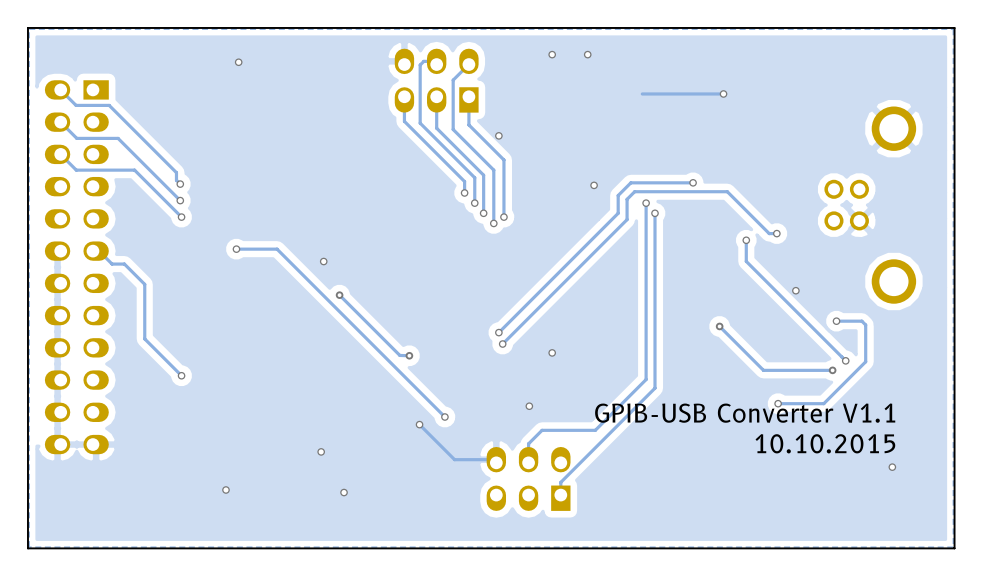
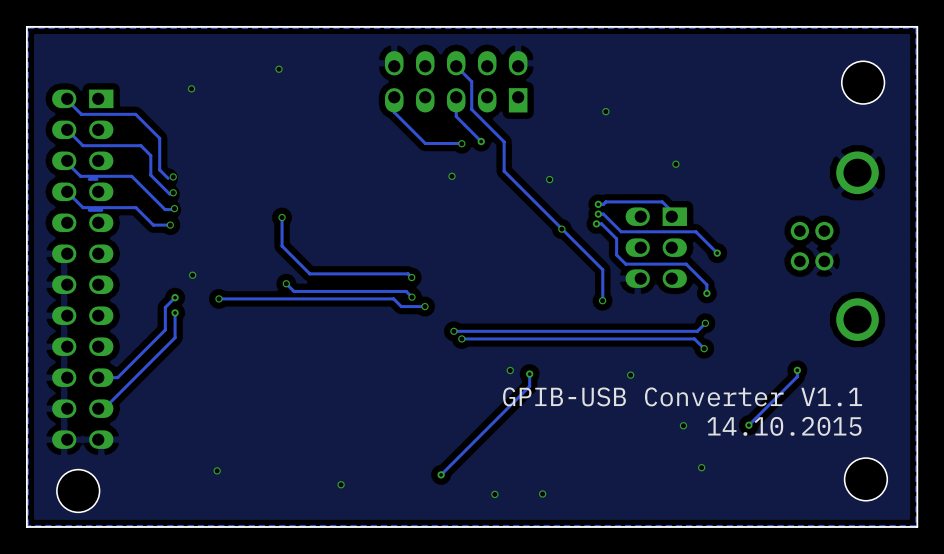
via: (552, 54) -> none
via: (587, 54) -> none
track: (436, 61) (423, 61) (420, 65) (420, 123) (474, 177) (474, 203) -> none
track: (468, 61) (468, 64) (453, 80) (453, 129) (493, 170) (493, 223) -> none
via: (238, 62) -> none
track: none -> (456, 63) (456, 66) (471, 81) (471, 109) (504, 141) (504, 171) (602, 269) (602, 300)
via: none -> (279, 69)
part: (436, 80) -> none
part: none -> (456, 81)
part: none -> (863, 82)
track: (57, 89) (60, 89) (76, 105) (109, 105) (176, 172) (176, 180) (180, 184) -> none
via: none -> (191, 88)
track: (723, 93) (642, 93) -> none
via: (723, 93) -> none
track: (404, 99) (404, 121) (464, 181) (464, 192) -> none
track: (436, 99) (436, 128) (483, 175) (483, 213) -> none
track: (468, 99) (468, 124) (503, 159) (503, 217) -> none
track: none -> (394, 97) (394, 112) (425, 143) (461, 143)
track: none -> (67, 98) (81, 114) (135, 114) (159, 138) (159, 169) (168, 178)
track: none -> (456, 100) (456, 116) (481, 141)
via: none -> (605, 111)
track: (57, 122) (60, 122) (76, 138) (118, 138) (180, 200) -> none
track: none -> (64, 129) (67, 129) (82, 145) (140, 145) (150, 155) (150, 175) (169, 194)
via position: (498, 135) -> (461, 143)
via: none -> (481, 141)
track: (57, 154) (60, 154) (76, 170) (134, 170) (181, 217) -> none
track: none -> (65, 160) (80, 176) (131, 176) (165, 209) (171, 209)
track: (693, 182) (630, 182) (618, 195) (618, 213) (498, 332) -> none
via position: (693, 182) -> (675, 164)
via: none -> (451, 176)
via position: (594, 185) -> (549, 179)
via: (464, 192) -> none
track: none -> (64, 191) (67, 191) (82, 207) (135, 207) (153, 225) (170, 225)
via: (474, 203) -> none
track: (646, 203) (646, 379) (595, 430) (542, 430) (528, 443) (528, 459) -> none
via: (646, 203) -> none
part position: (870, 205) -> (834, 246)
track: none -> (598, 204) (603, 204) (605, 201) (662, 201) (674, 214) (674, 216)
via: none -> (598, 204)
via: (483, 213) -> none
track: (654, 213) (654, 388) (560, 482) (560, 498) -> none
via: (654, 213) -> none
via: (503, 217) -> none
track: none -> (598, 214) (603, 214) (621, 231) (695, 231) (717, 253)
via: none -> (598, 214)
via: (493, 223) -> none
track: none -> (282, 217) (282, 246) (309, 273) (408, 273) (411, 277)
via: none -> (282, 217)
track: none -> (596, 223) (601, 223) (616, 238) (616, 254) (625, 264) (686, 264) (706, 284) (706, 293)
via: none -> (596, 223)
track: (776, 233) (769, 233) (727, 191) (634, 191) (627, 199) (627, 219) (502, 344) -> none
via: (776, 233) -> none
via: none -> (170, 225)
via: none -> (561, 229)
track: (746, 240) (746, 261) (845, 360) -> none
via: (746, 240) -> none
track: (236, 249) (277, 249) (444, 417) -> none
via: (236, 249) -> none
track: (96, 251) (99, 251) (112, 264) (124, 264) (144, 284) (144, 338) (181, 375) -> none
part: none -> (656, 247)
via: (323, 261) -> none
via: none -> (717, 253)
part position: (76, 267) -> (82, 269)
via: none -> (192, 275)
via: none -> (411, 277)
via: (795, 290) -> none
track: none -> (286, 283) (294, 291) (406, 291) (411, 297)
via: none -> (286, 283)
track: (339, 295) (399, 355) (409, 355) -> none
via: (339, 295) -> none
track: none -> (175, 297) (165, 307) (165, 329) (117, 377) (98, 377)
via: none -> (175, 297)
via: none -> (411, 297)
track: none -> (218, 298) (393, 298) (401, 306) (425, 306)
via: none -> (218, 298)
via: none -> (602, 300)
via: none -> (425, 306)
track: (836, 321) (861, 321) (865, 324) (865, 361) (823, 403) (778, 403) -> none
via: (836, 321) -> none
track: none -> (175, 312) (175, 337) (104, 408) (98, 408)
via: none -> (175, 312)
track: (719, 326) (763, 370) (832, 370) -> none
via position: (719, 326) -> (706, 293)
via: (498, 332) -> none
track: none -> (705, 323) (697, 331) (453, 331)
via: none -> (705, 323)
via: none -> (453, 331)
via: (502, 344) -> none
track: none -> (461, 338) (694, 338) (704, 348)
via: none -> (461, 338)
via: (552, 352) -> none
via: (409, 355) -> none
via: (845, 360) -> none
via: none -> (704, 348)
via position: (832, 370) -> (797, 370)
via: (181, 375) -> none
via: none -> (510, 370)
track: none -> (797, 370) (797, 376) (748, 425)
track: none -> (529, 374) (529, 386) (441, 474)
via: none -> (529, 374)
via: none -> (630, 375)
via: (778, 403) -> none
via: (529, 406) -> none
via: (444, 417) -> none
track: (419, 424) (454, 459) (496, 459) -> none
via: (419, 424) -> none
via: none -> (748, 425)
via: none -> (683, 425)
text: 10.10.2015 (825, 443) -> 14.10.2015 (784, 426)
via: (321, 451) -> none
via: (892, 467) -> none
part: (528, 478) -> none
via: none -> (701, 467)
via position: (344, 492) -> (341, 484)
via: none -> (441, 474)
part: none -> (865, 479)
part: none -> (78, 490)
via: none -> (494, 494)
via: none -> (542, 493)

